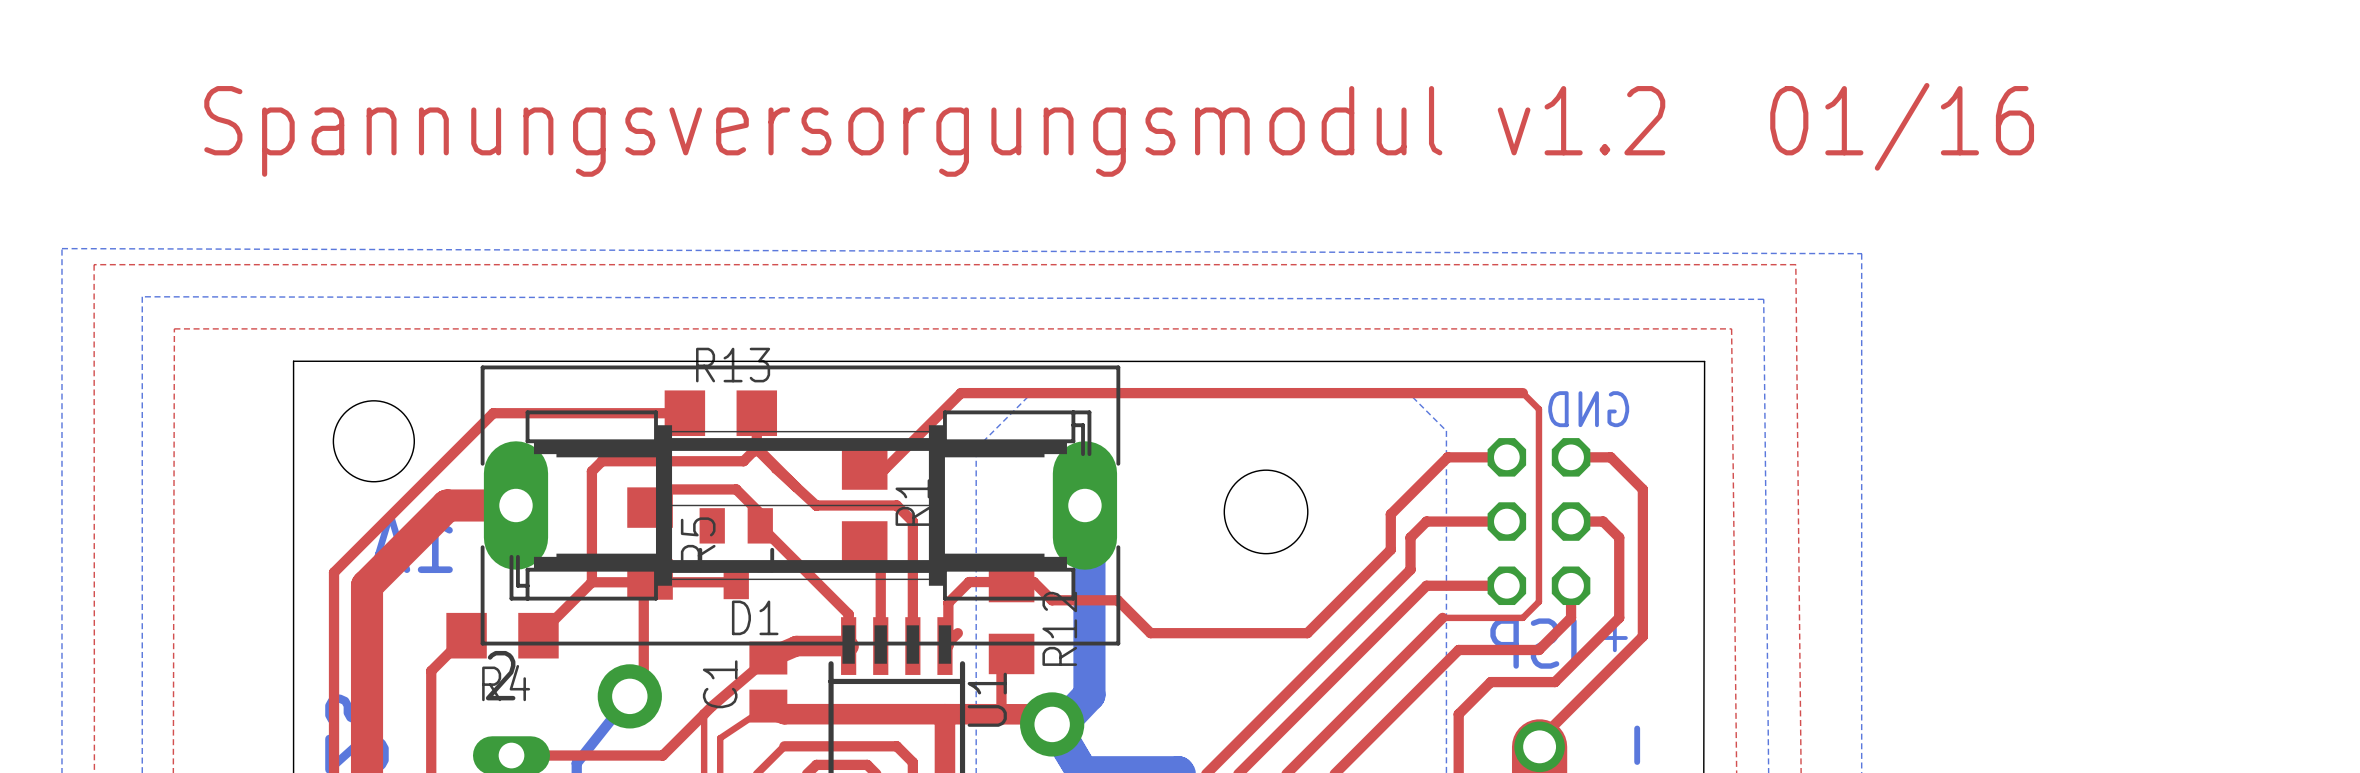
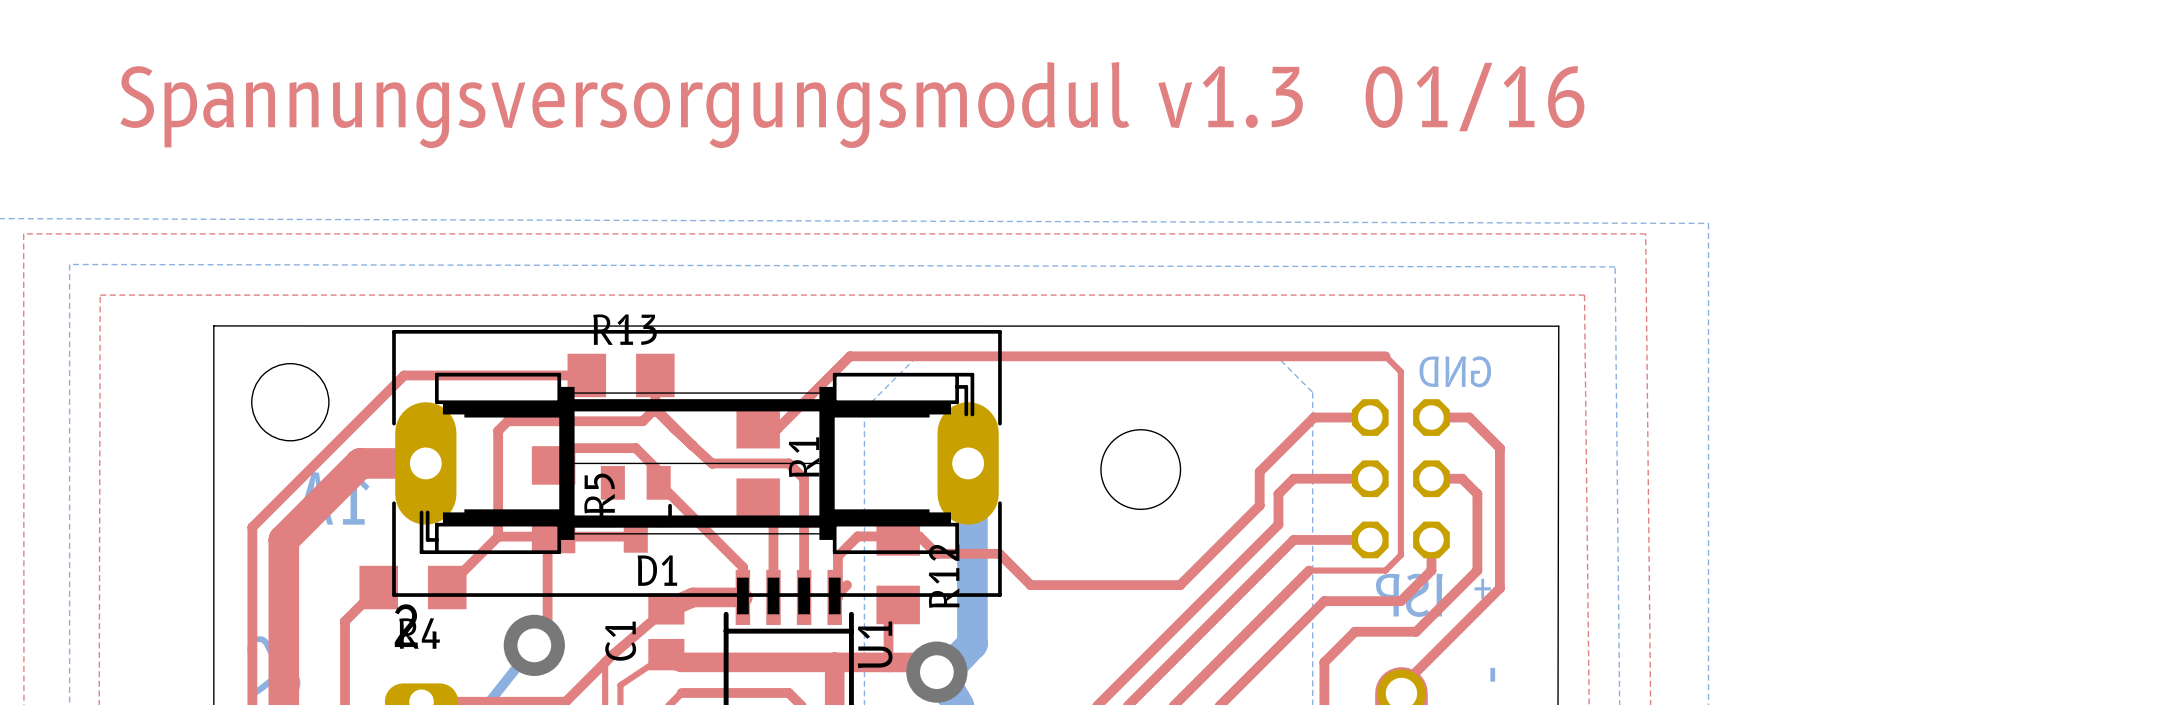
text: Spannungsversorgungsmodul v1.2 01/16 (1119, 129) -> Spannungsversorgungsmodul v1.3 01/16 (852, 105)

